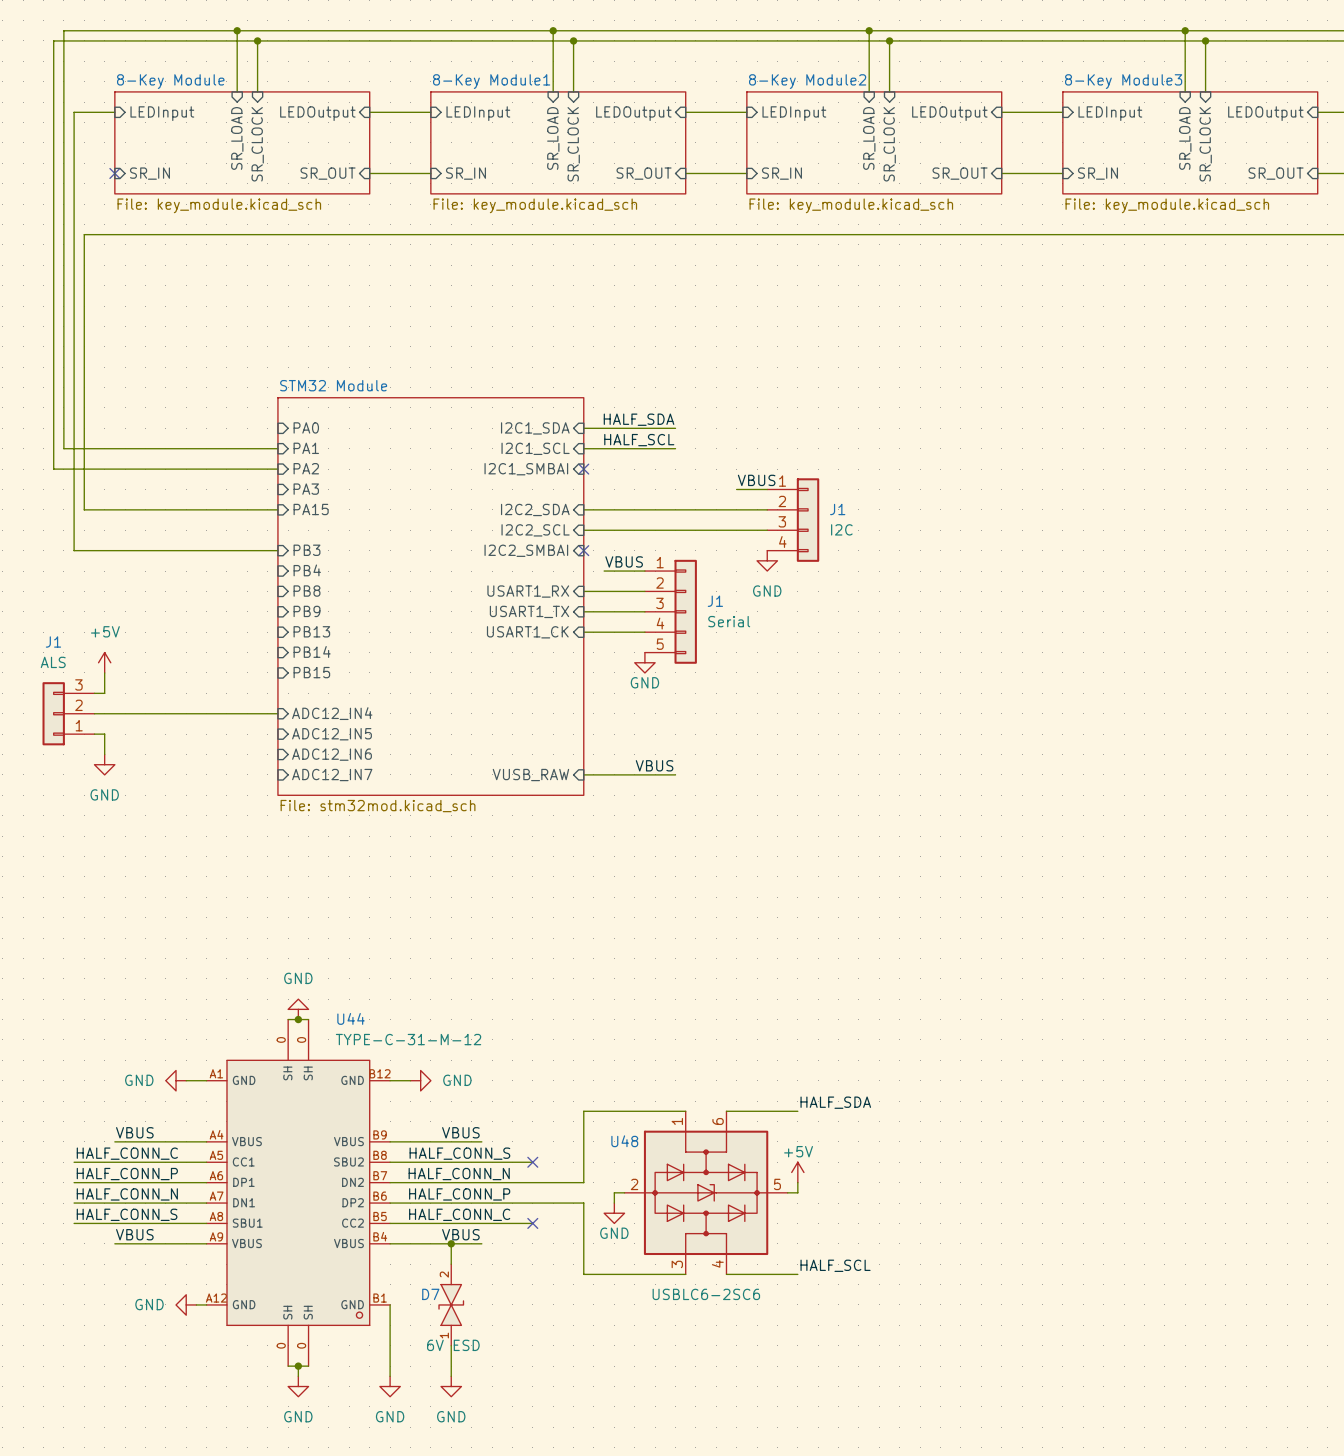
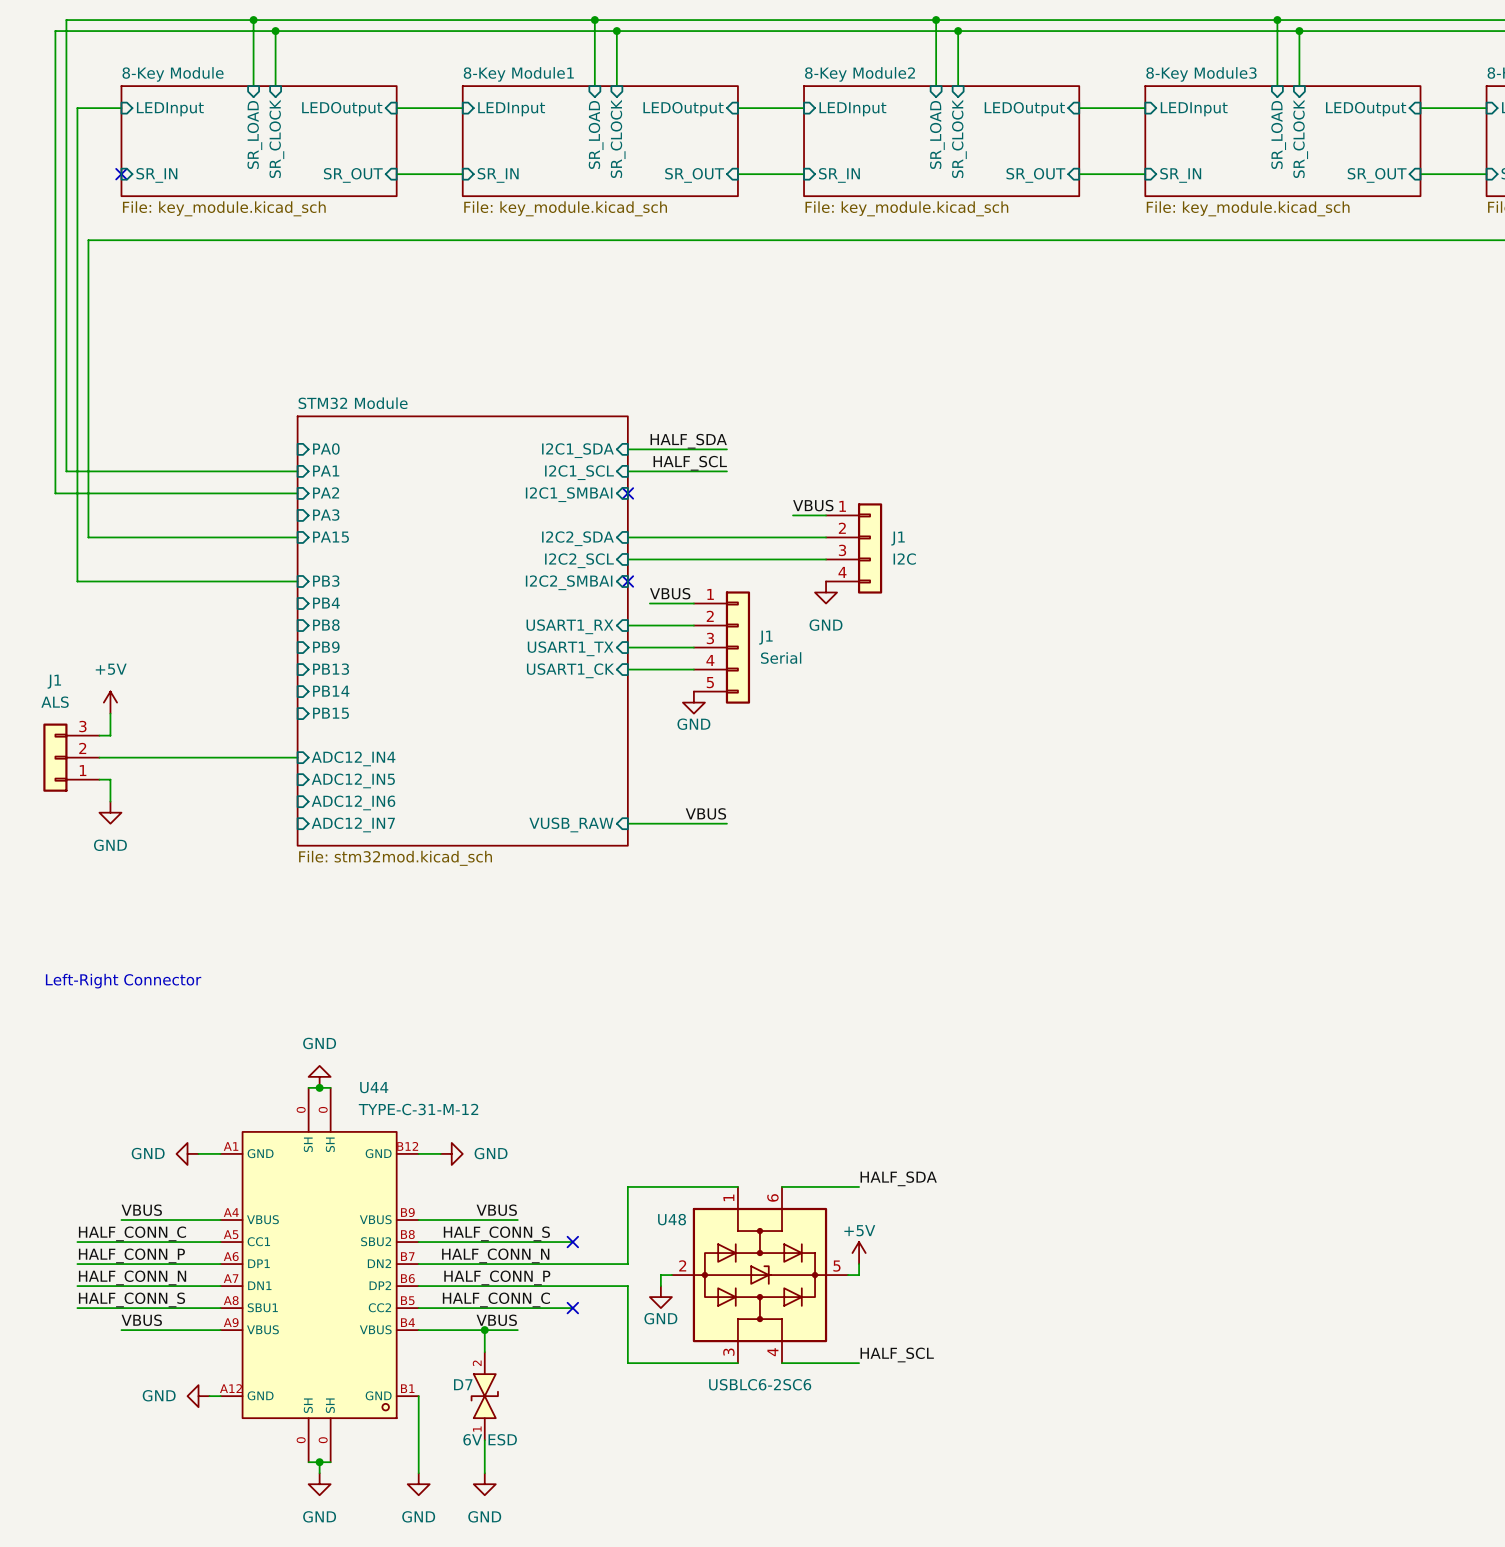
text: none -> Left-Right Connector (123, 981)

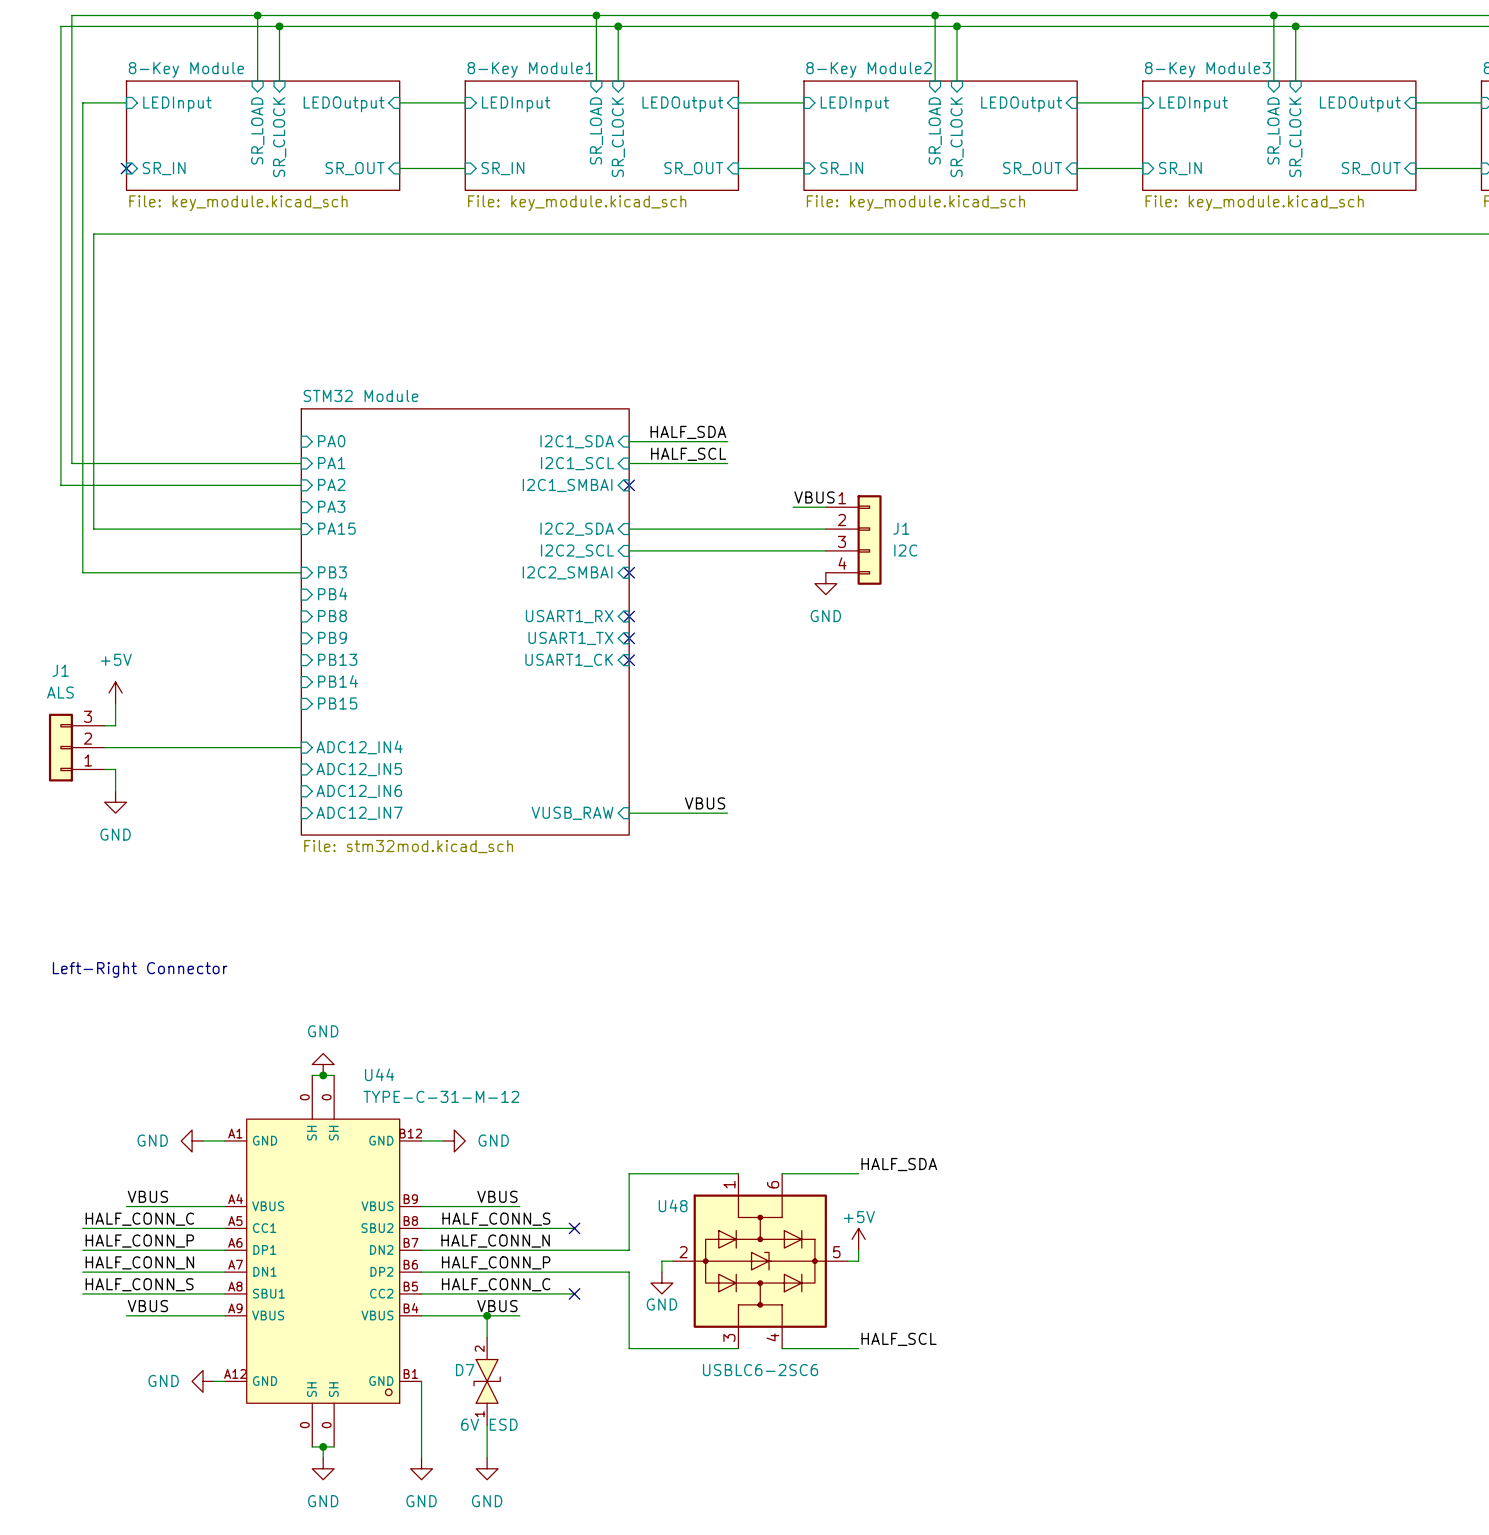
label: VBUS (670, 593) -> none
wire: (649, 603) (693, 603) -> none
wire: (627, 625) (693, 625) -> none
no-connect mark: none -> (629, 616)
wire: (627, 647) (693, 647) -> none
no-connect mark: none -> (629, 638)
J1: Serial (722, 647) -> none
wire: (627, 669) (693, 669) -> none
no-connect mark: none -> (629, 660)
power symbol: GND (693, 702) -> none

